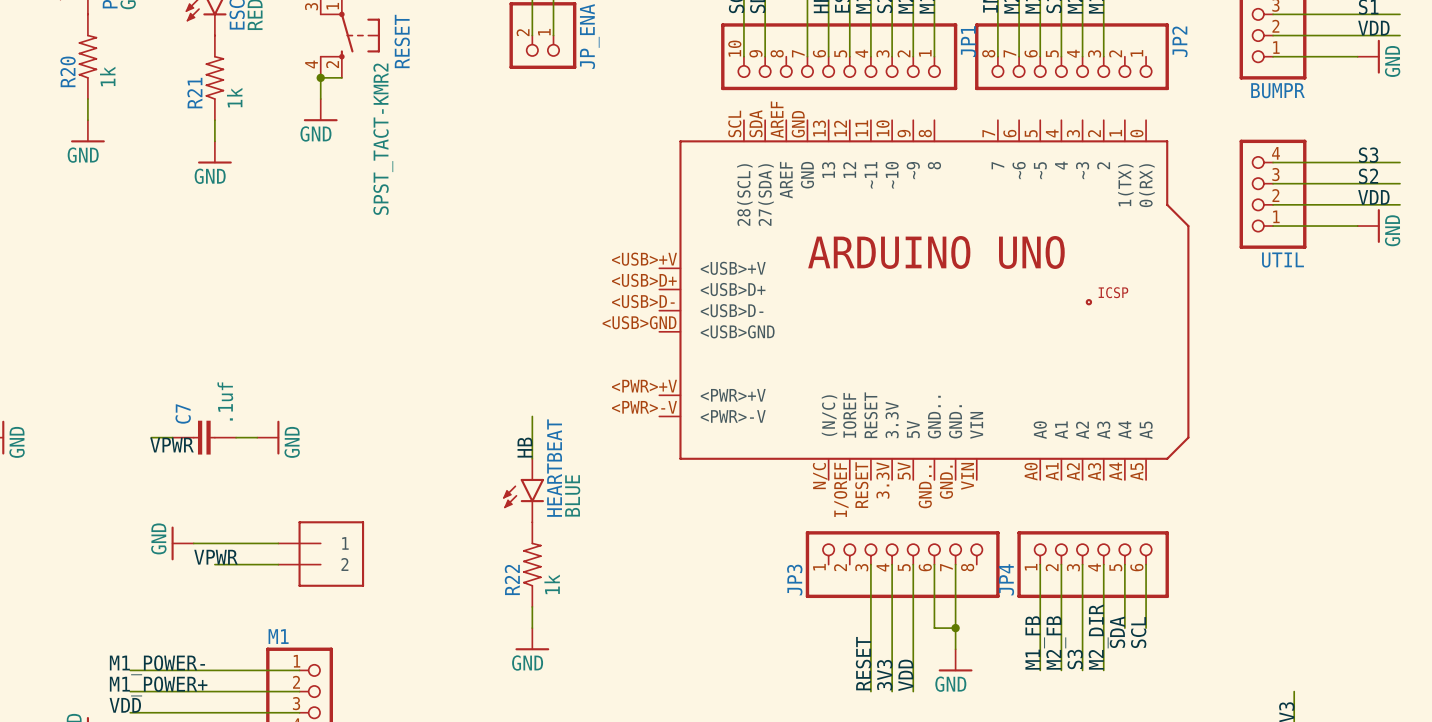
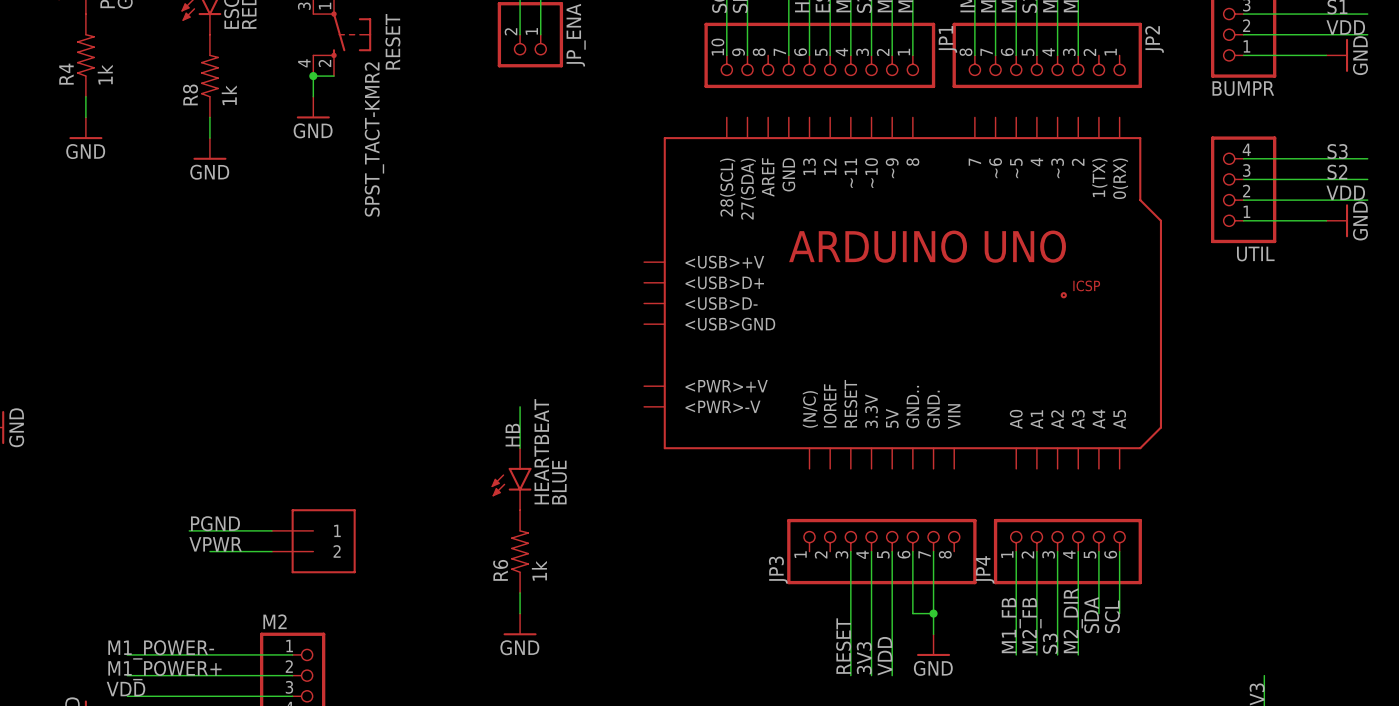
R20 name: R20 (68, 71) -> R4 (66, 74)
R21 name: R21 (194, 93) -> R8 (190, 94)
part symbol: [659, 120, 1190, 480] -> [644, 117, 1162, 469]
wire: (151, 437) (172, 437) -> none
C7: .1uf (204, 437) -> none
wire: (236, 437) (257, 437) -> none
power symbol: GND (268, 437) -> none
label: VPWR (171, 445) -> none
label: none -> PGND (215, 523)
power symbol: GND (182, 543) -> none
R22 name: R22 (512, 579) -> R6 (500, 570)
M1 name: M1 (278, 636) -> M2 (275, 621)

